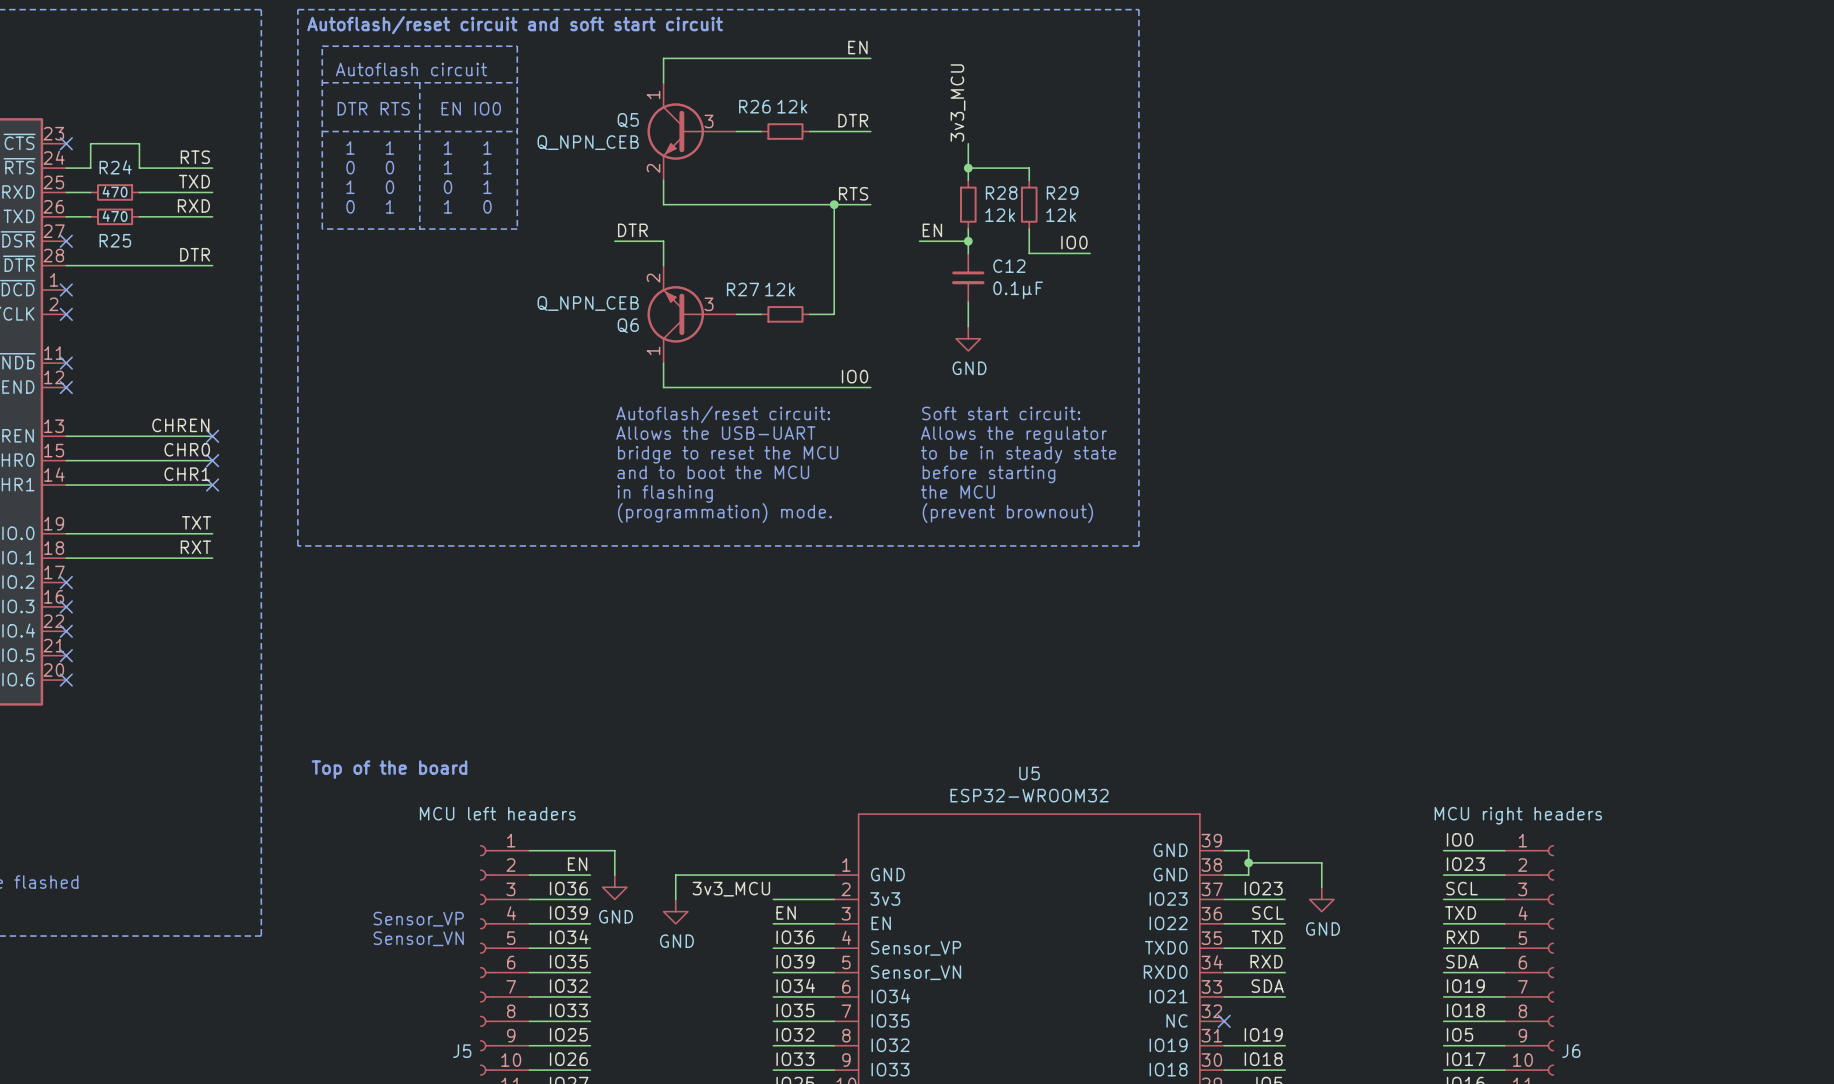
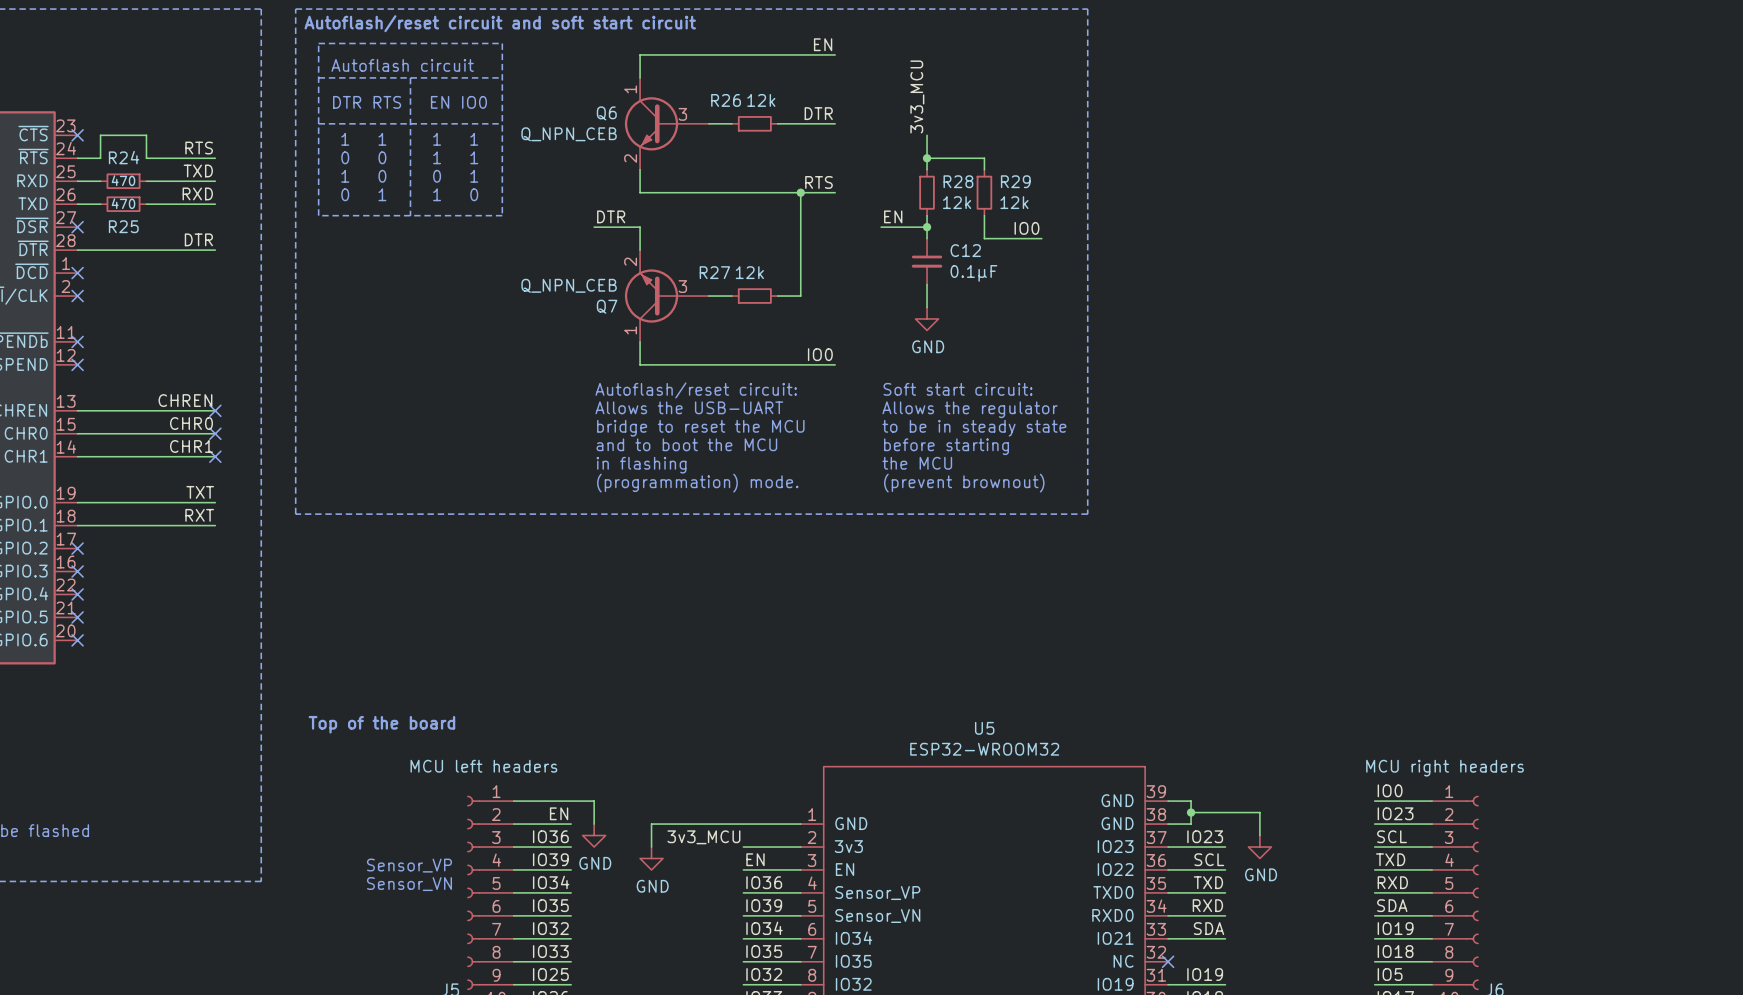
Q5 name: Q5 (628, 120) -> Q6 (606, 113)
Q6 name: Q6 (628, 325) -> Q7 (607, 306)

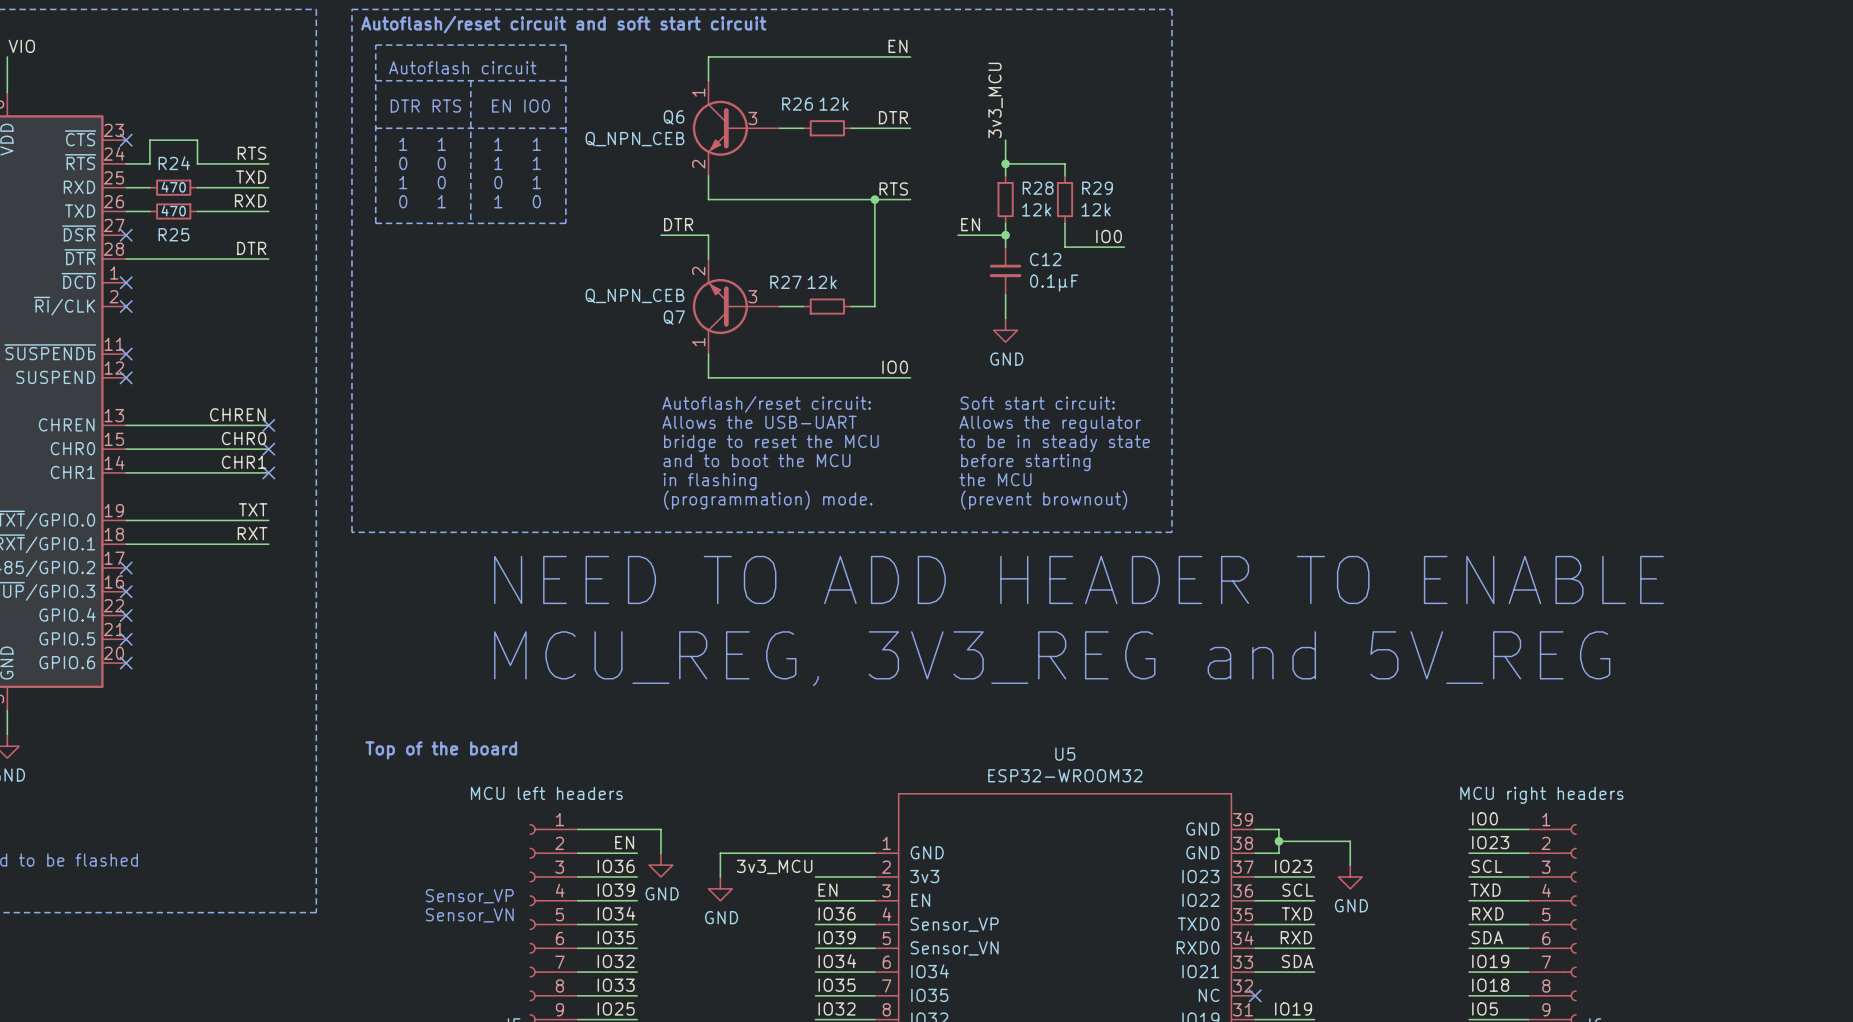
text: none -> NEED TO ADD HEADER TO ENABLE (1078, 579)
text: none -> MCU_REG, 3V3_REG and 5V_REG (1052, 658)

